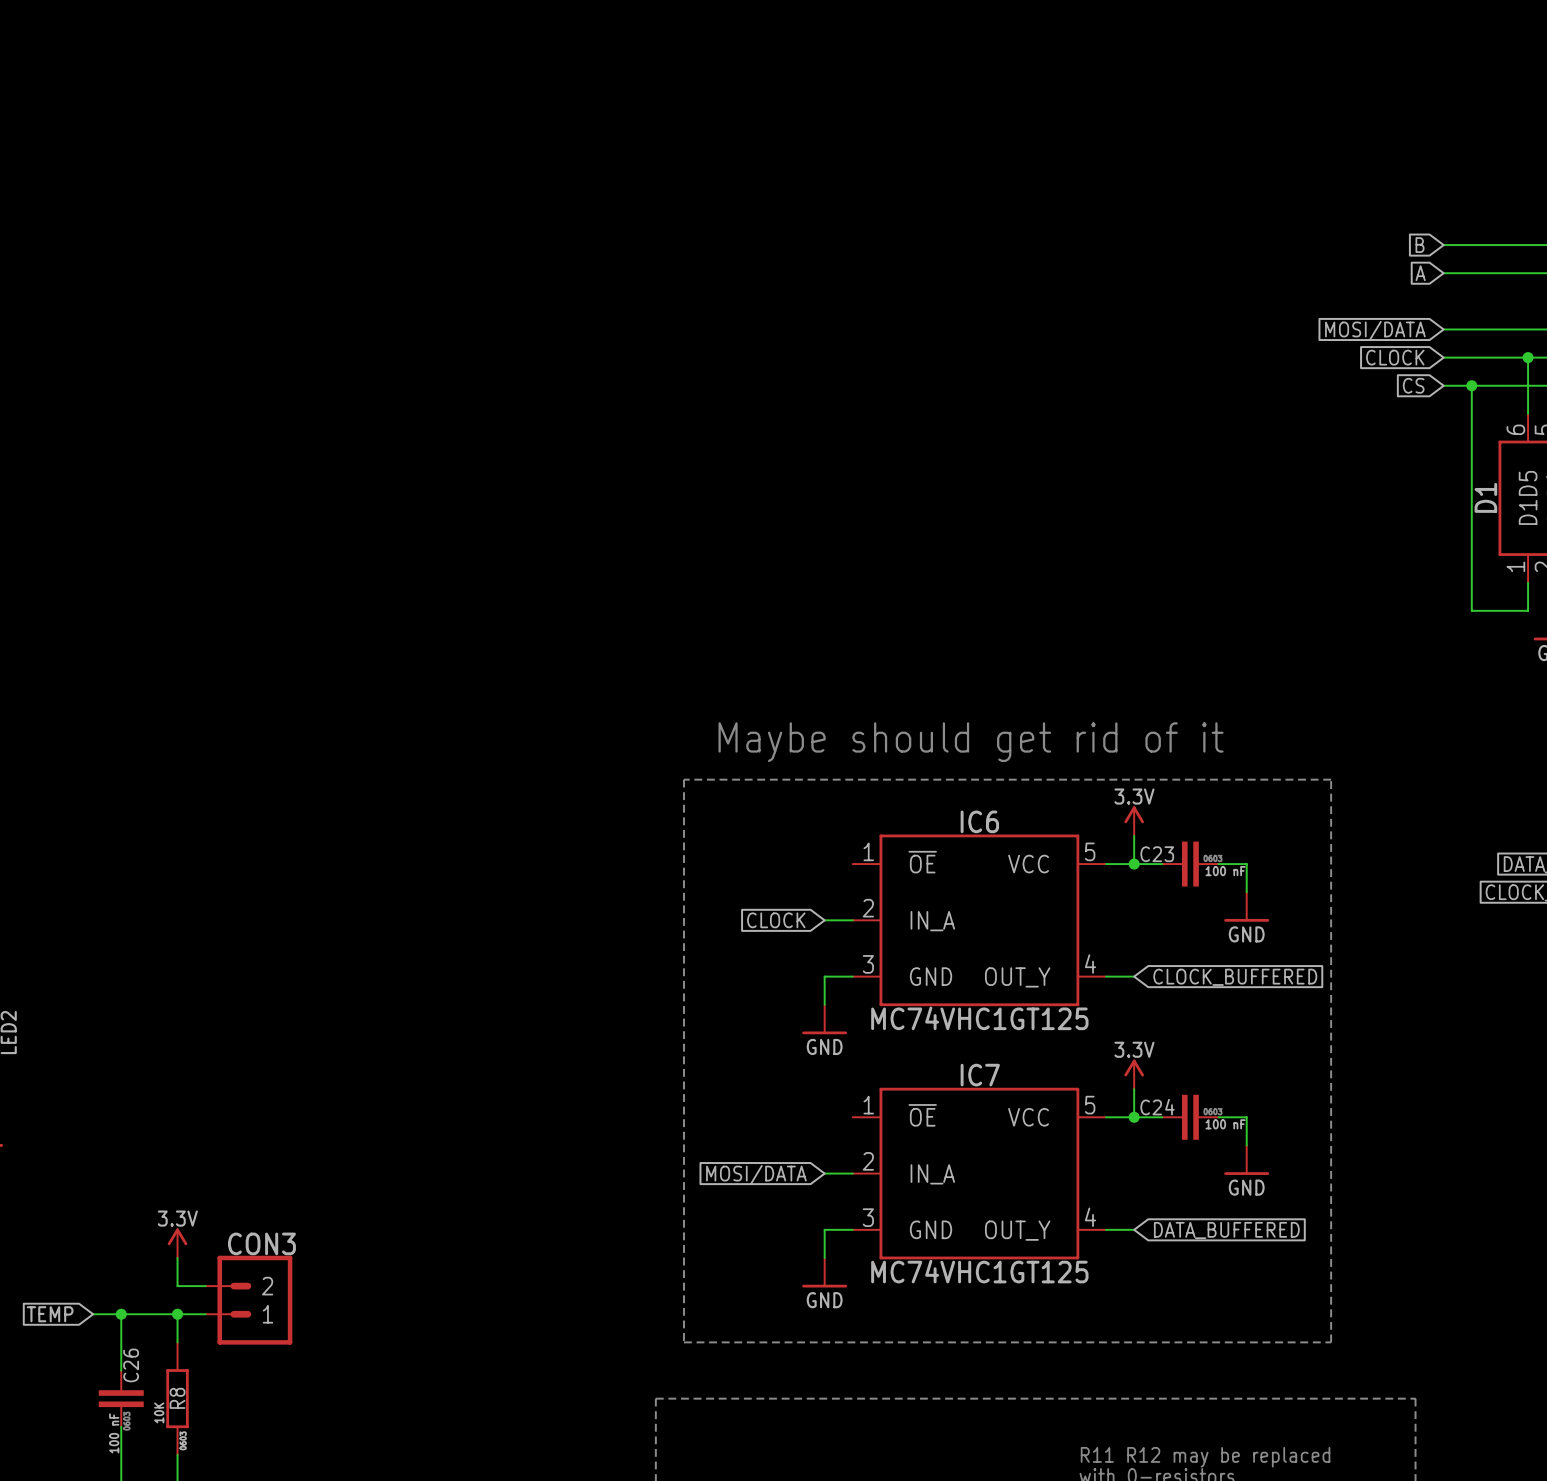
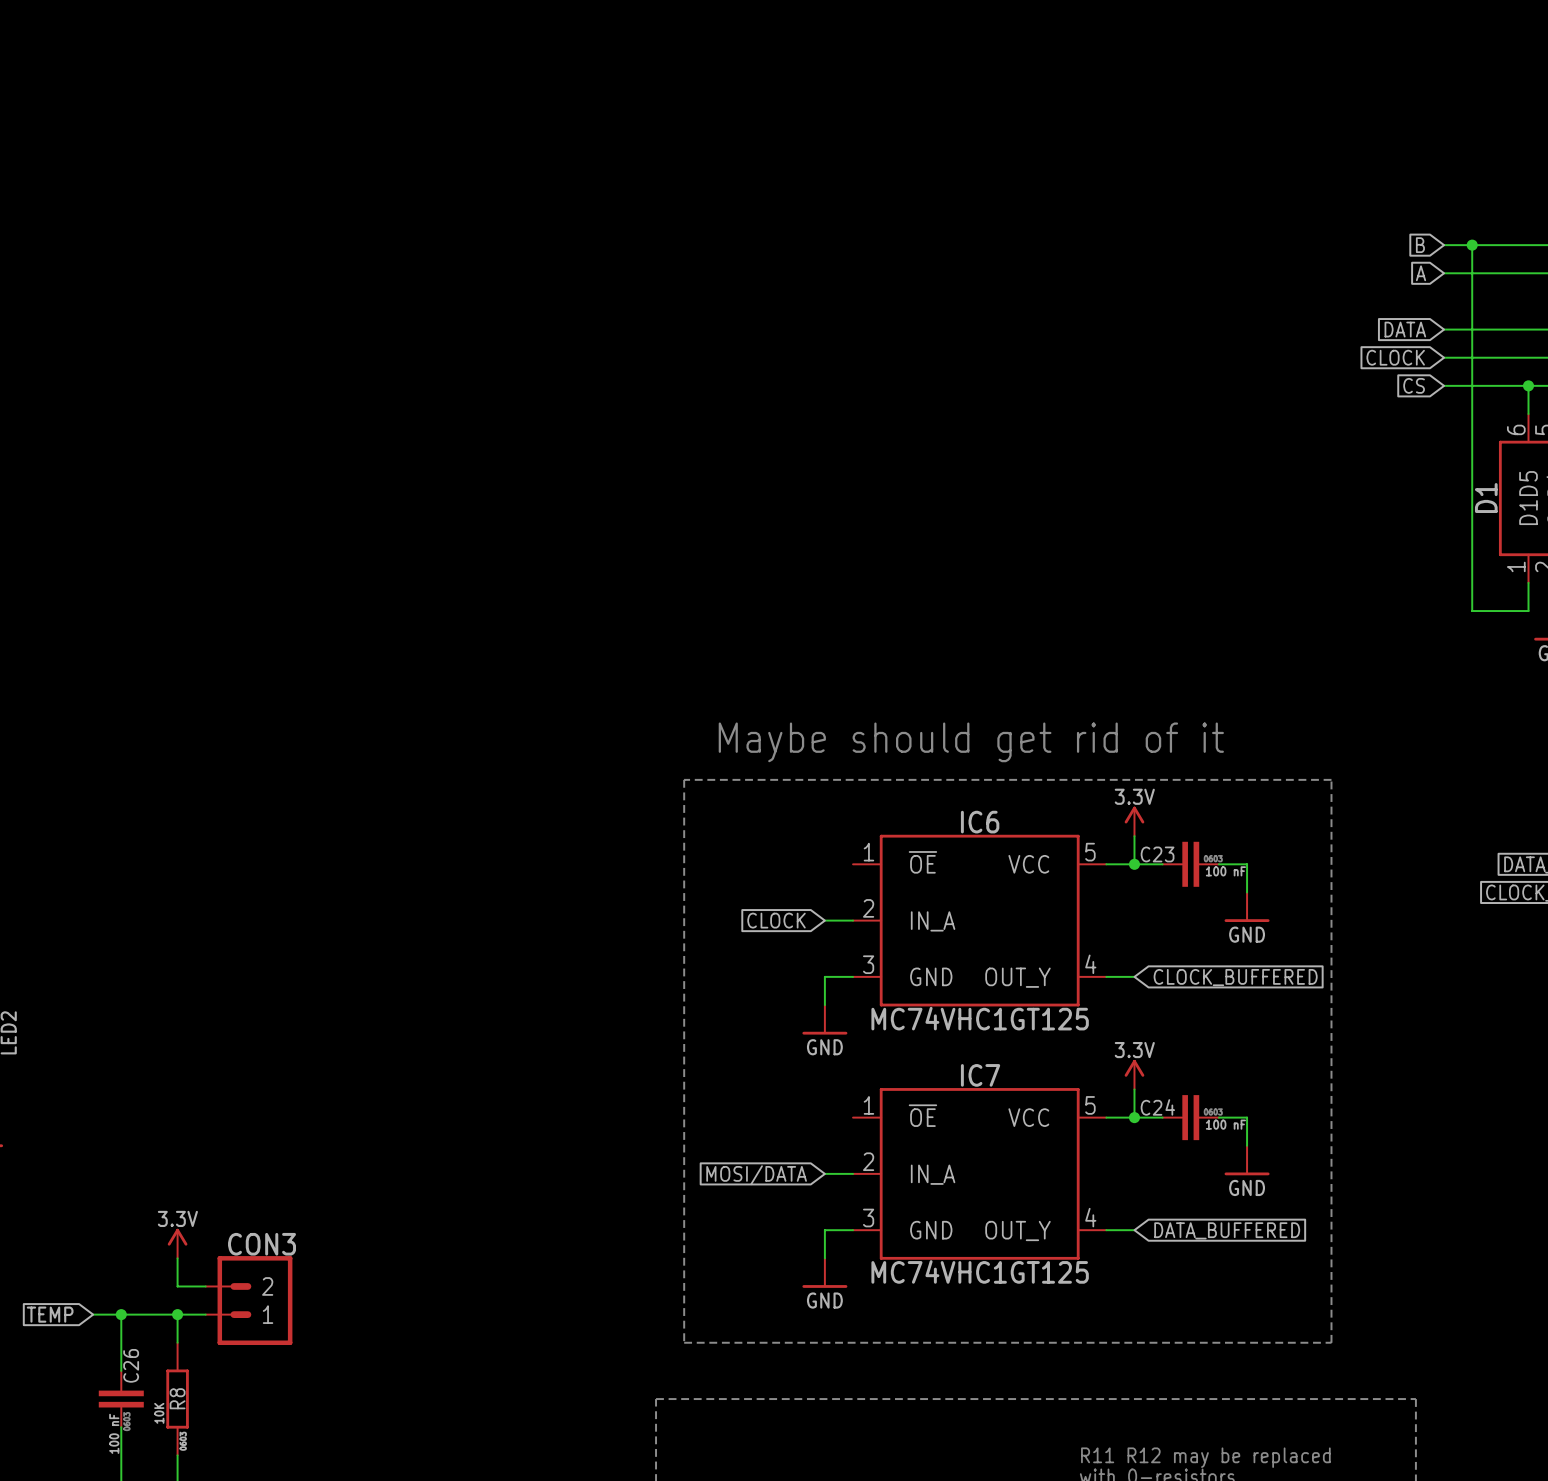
wire: none -> (1472, 245) (1472, 385)
junction: none -> (1472, 245)
global label: MOSI/DATA (1375, 330) -> DATA (1405, 329)
wire: (1528, 357) (1528, 385) -> none
junction: (1528, 357) -> none
junction: (1471, 385) -> none
junction: none -> (1528, 385)

